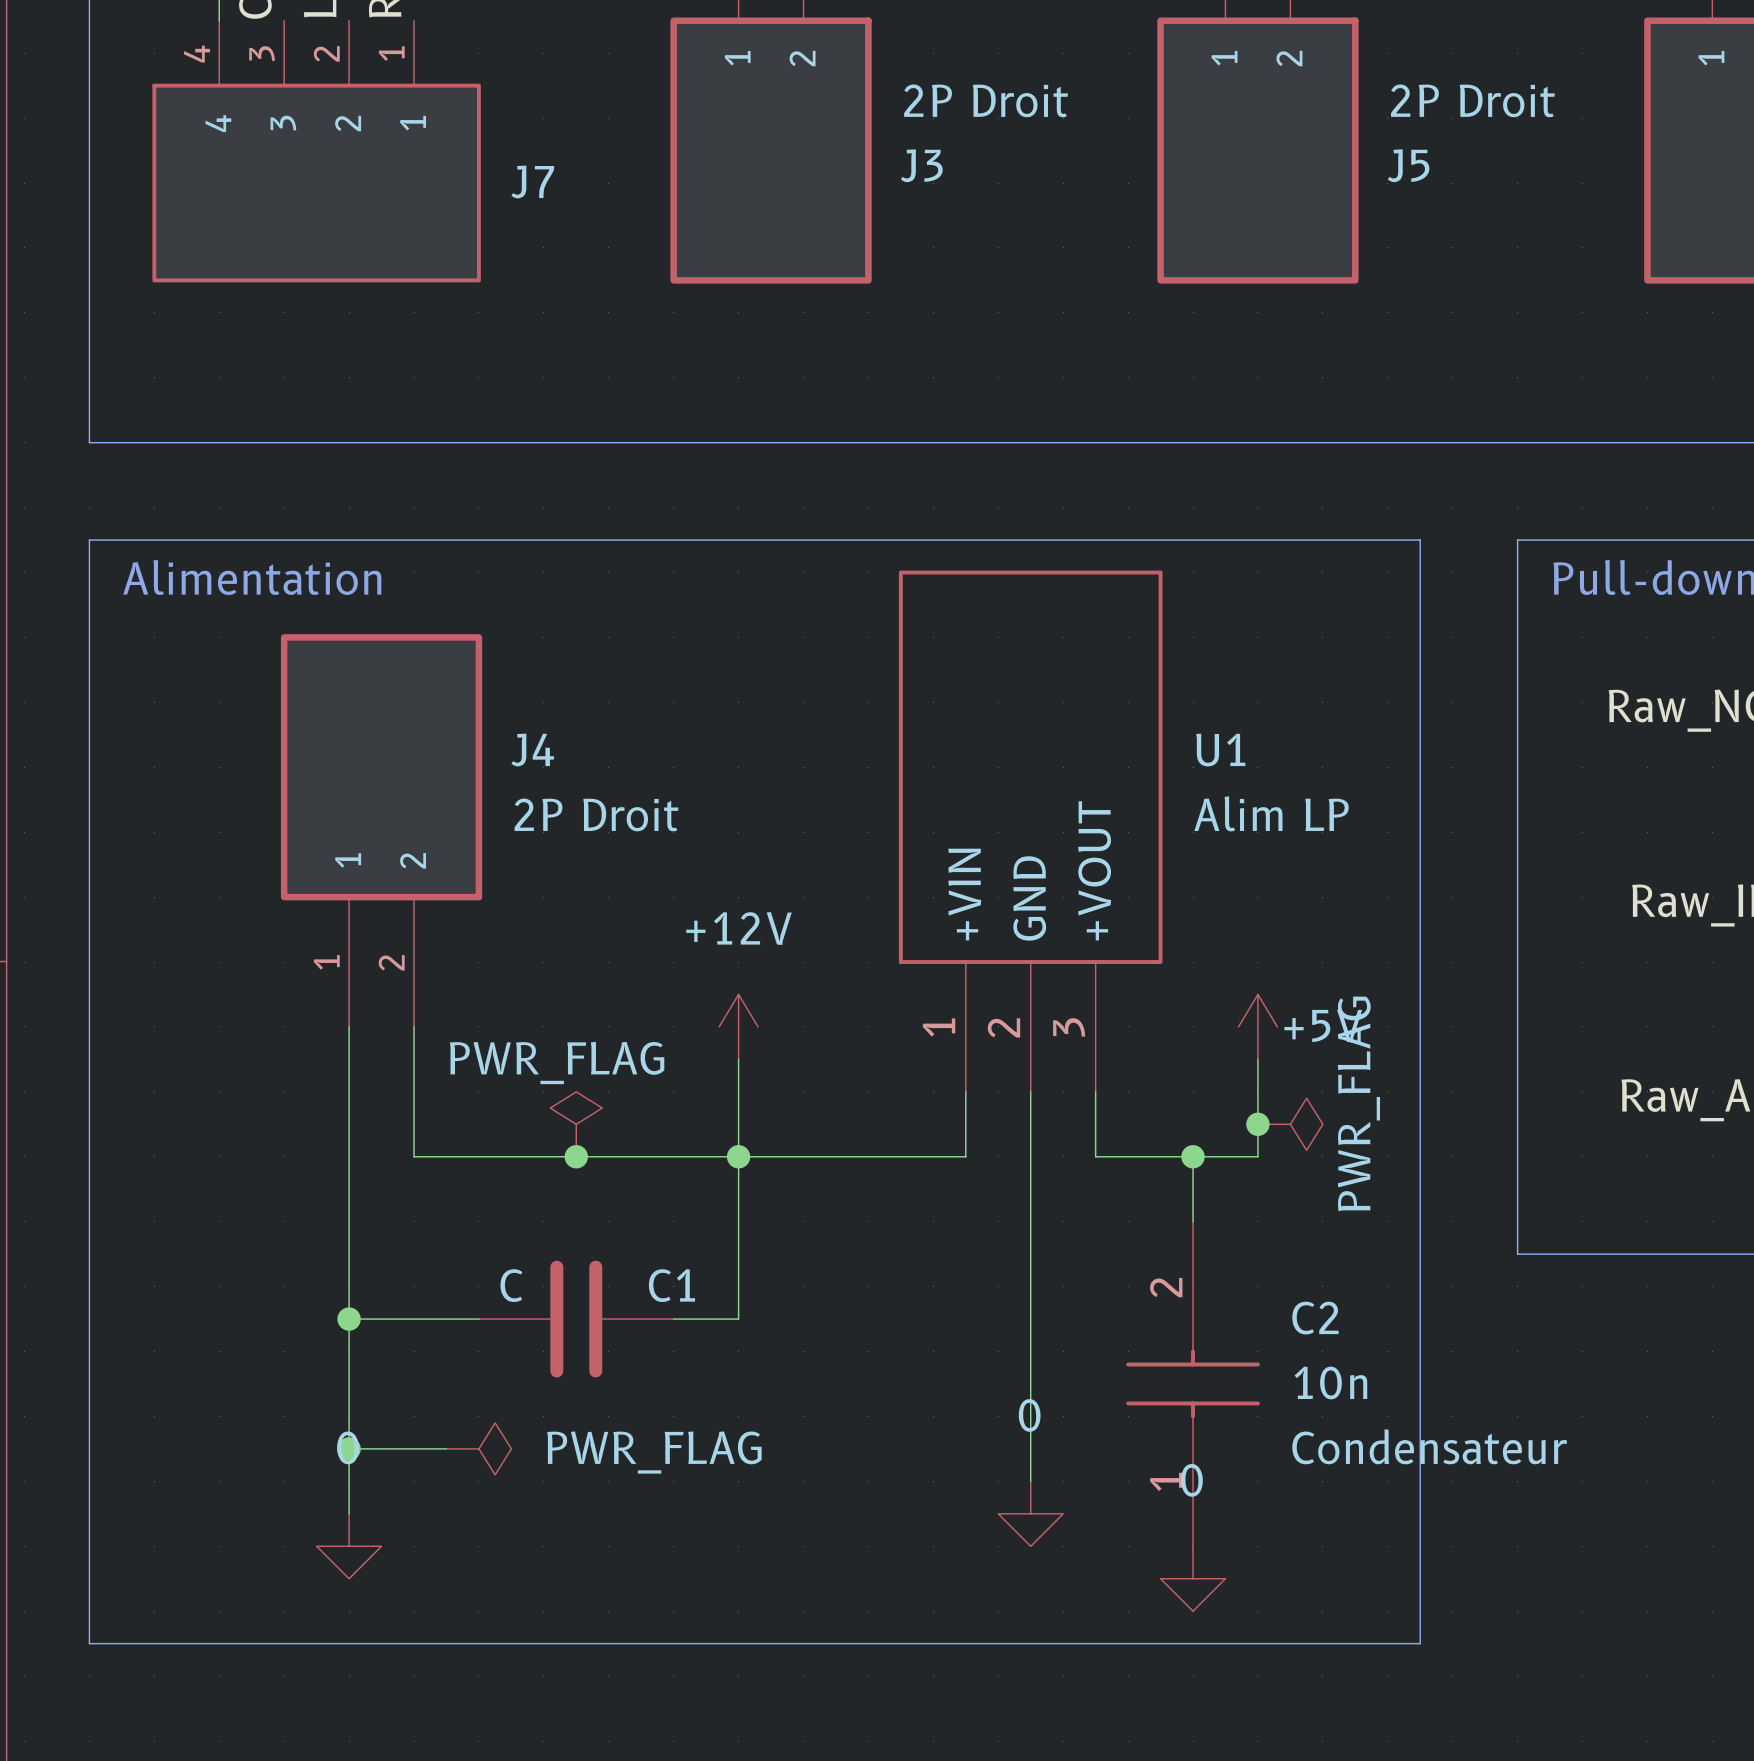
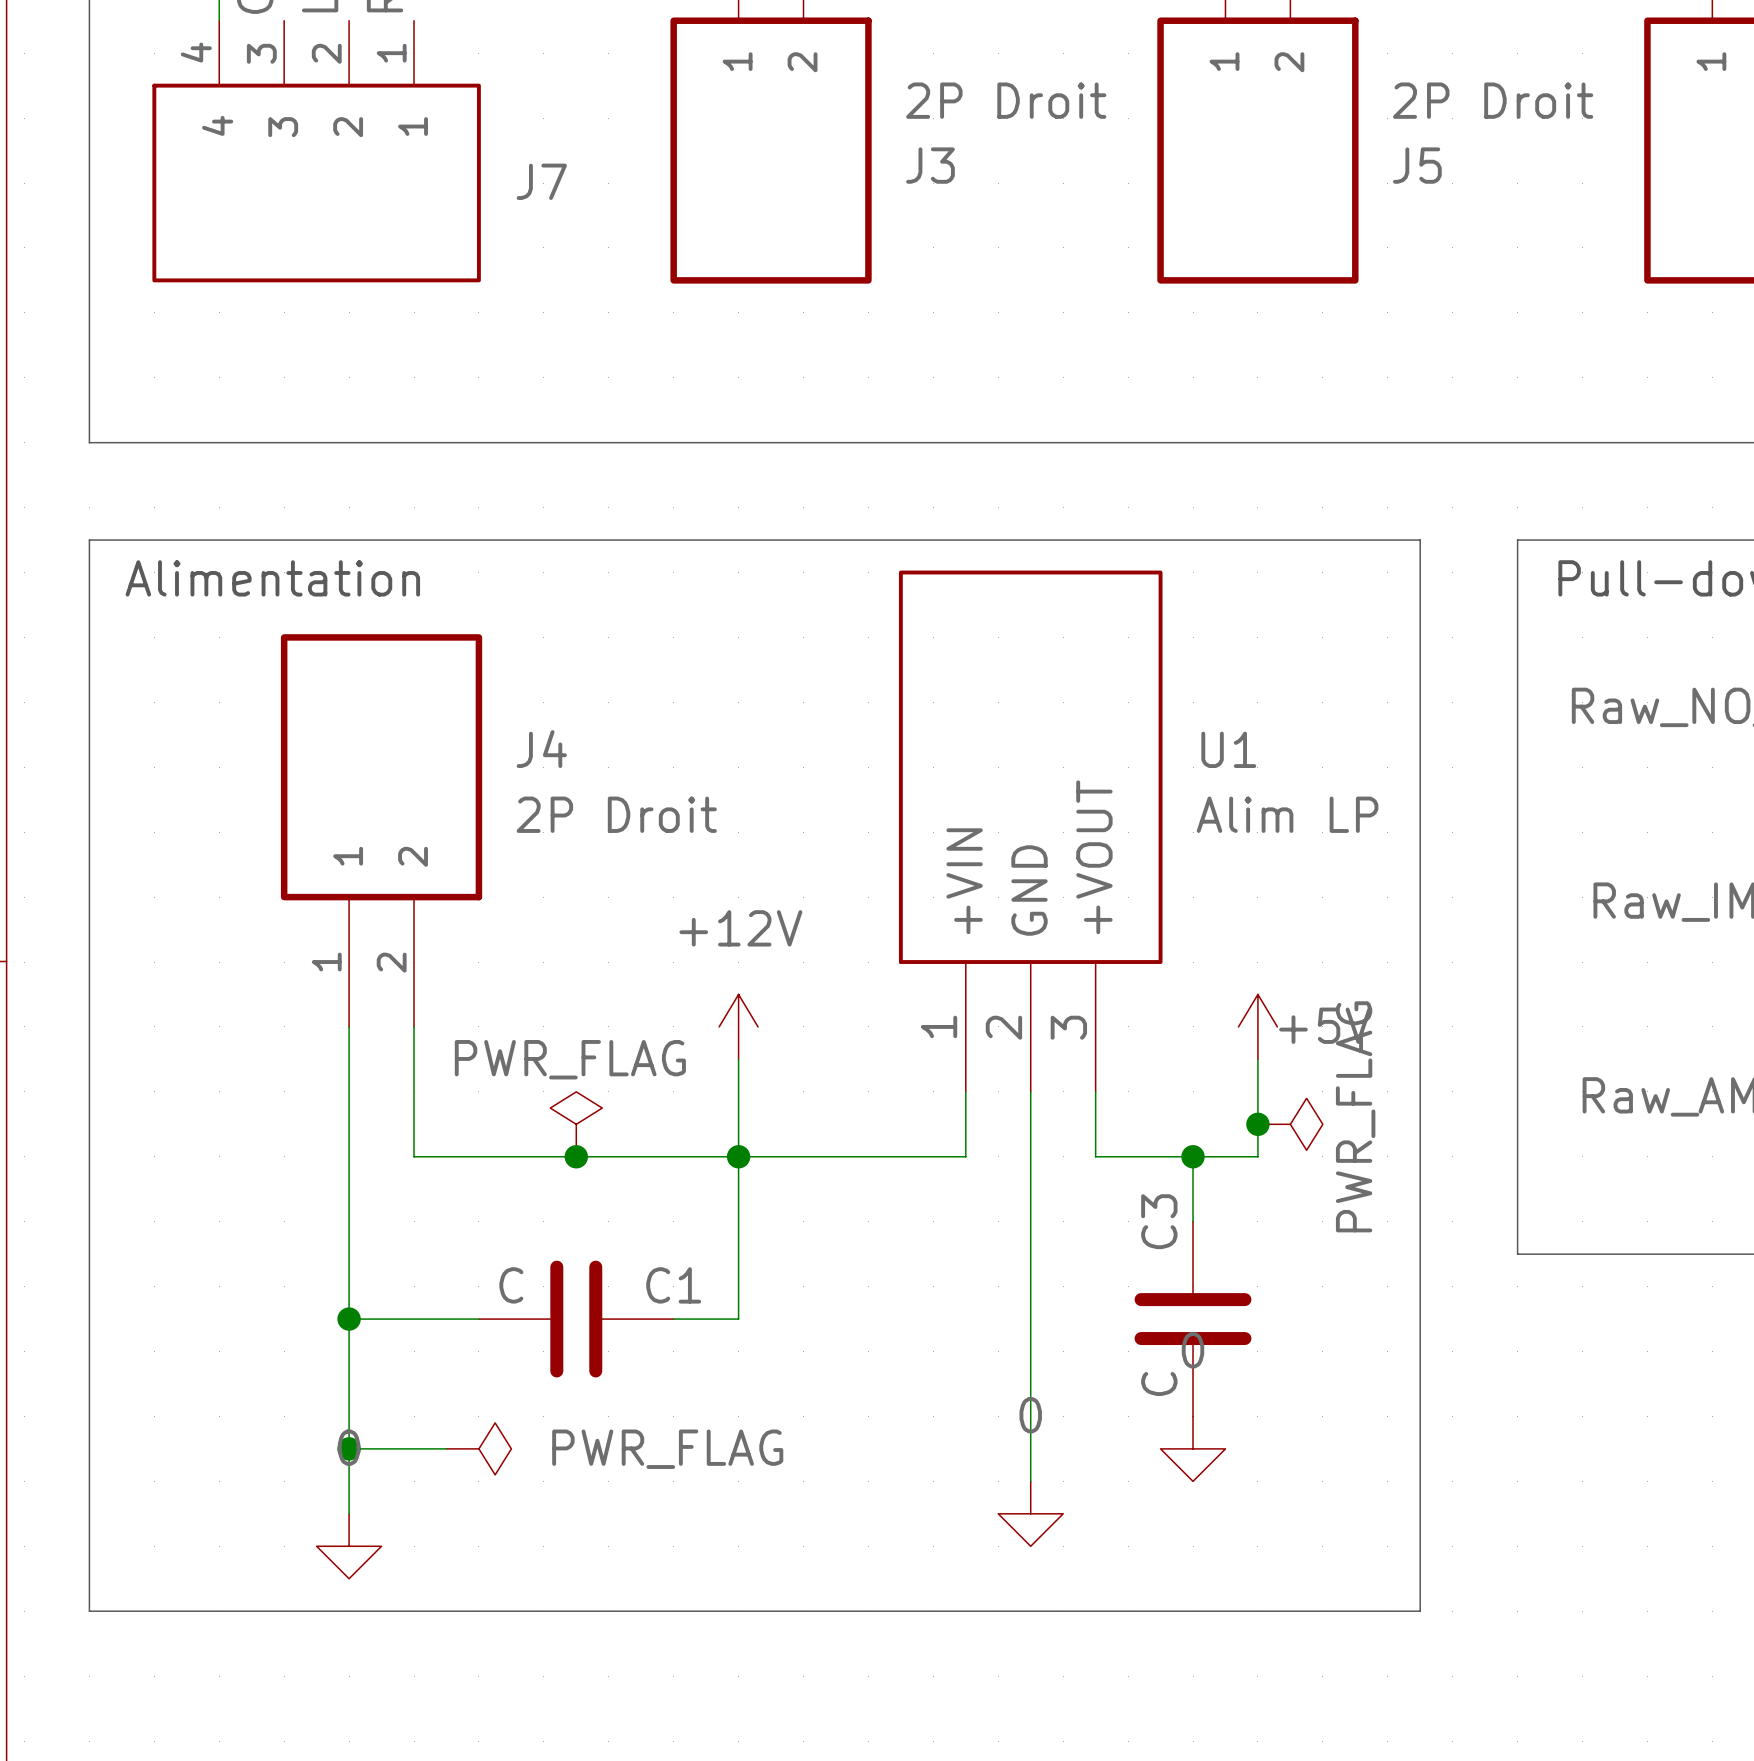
C3: none -> C (1193, 1319)
C2: 10n (1193, 1383) -> none
power symbol position: 0 (1193, 1578) -> 0 (1193, 1448)
line: (89, 1611) (89, 1643) (1420, 1643) (1420, 1611) -> (89, 1611) (1420, 1611)

